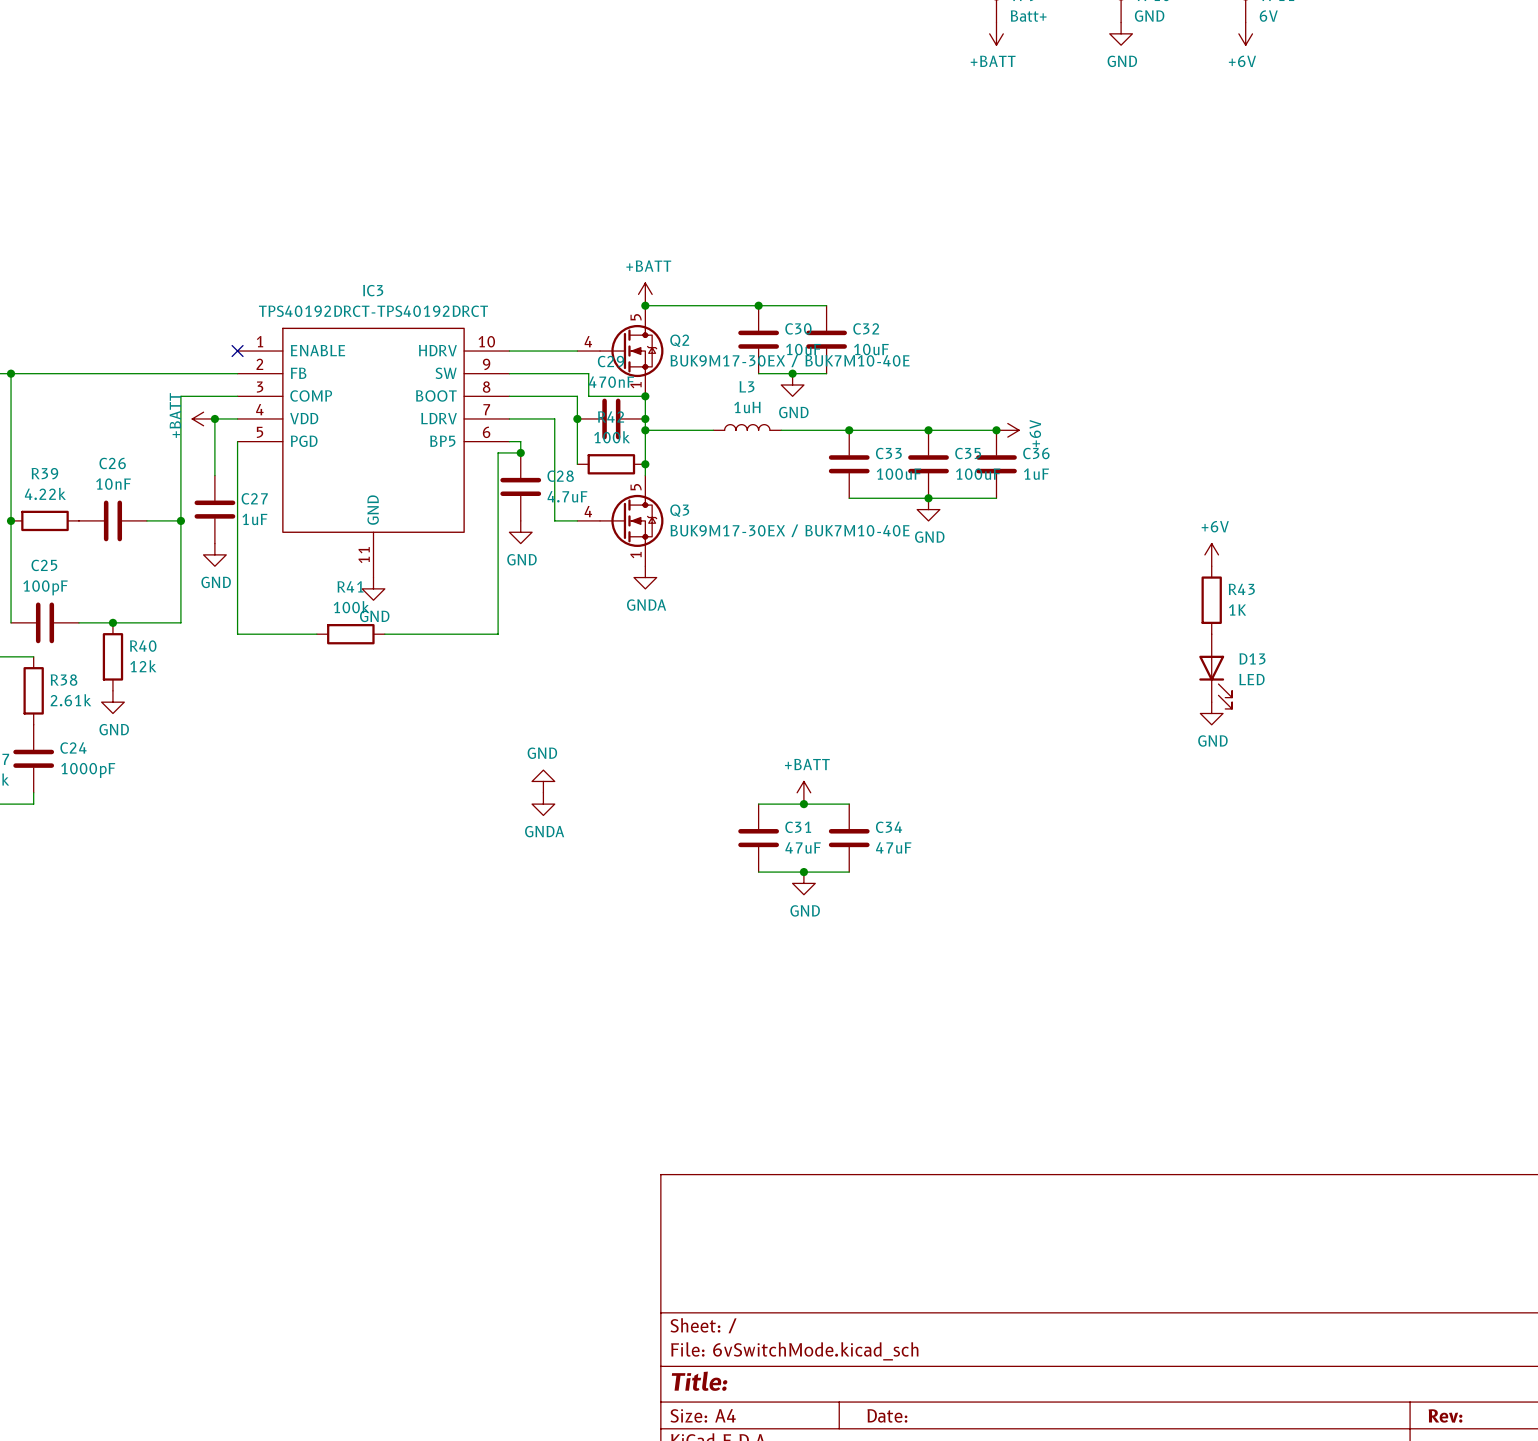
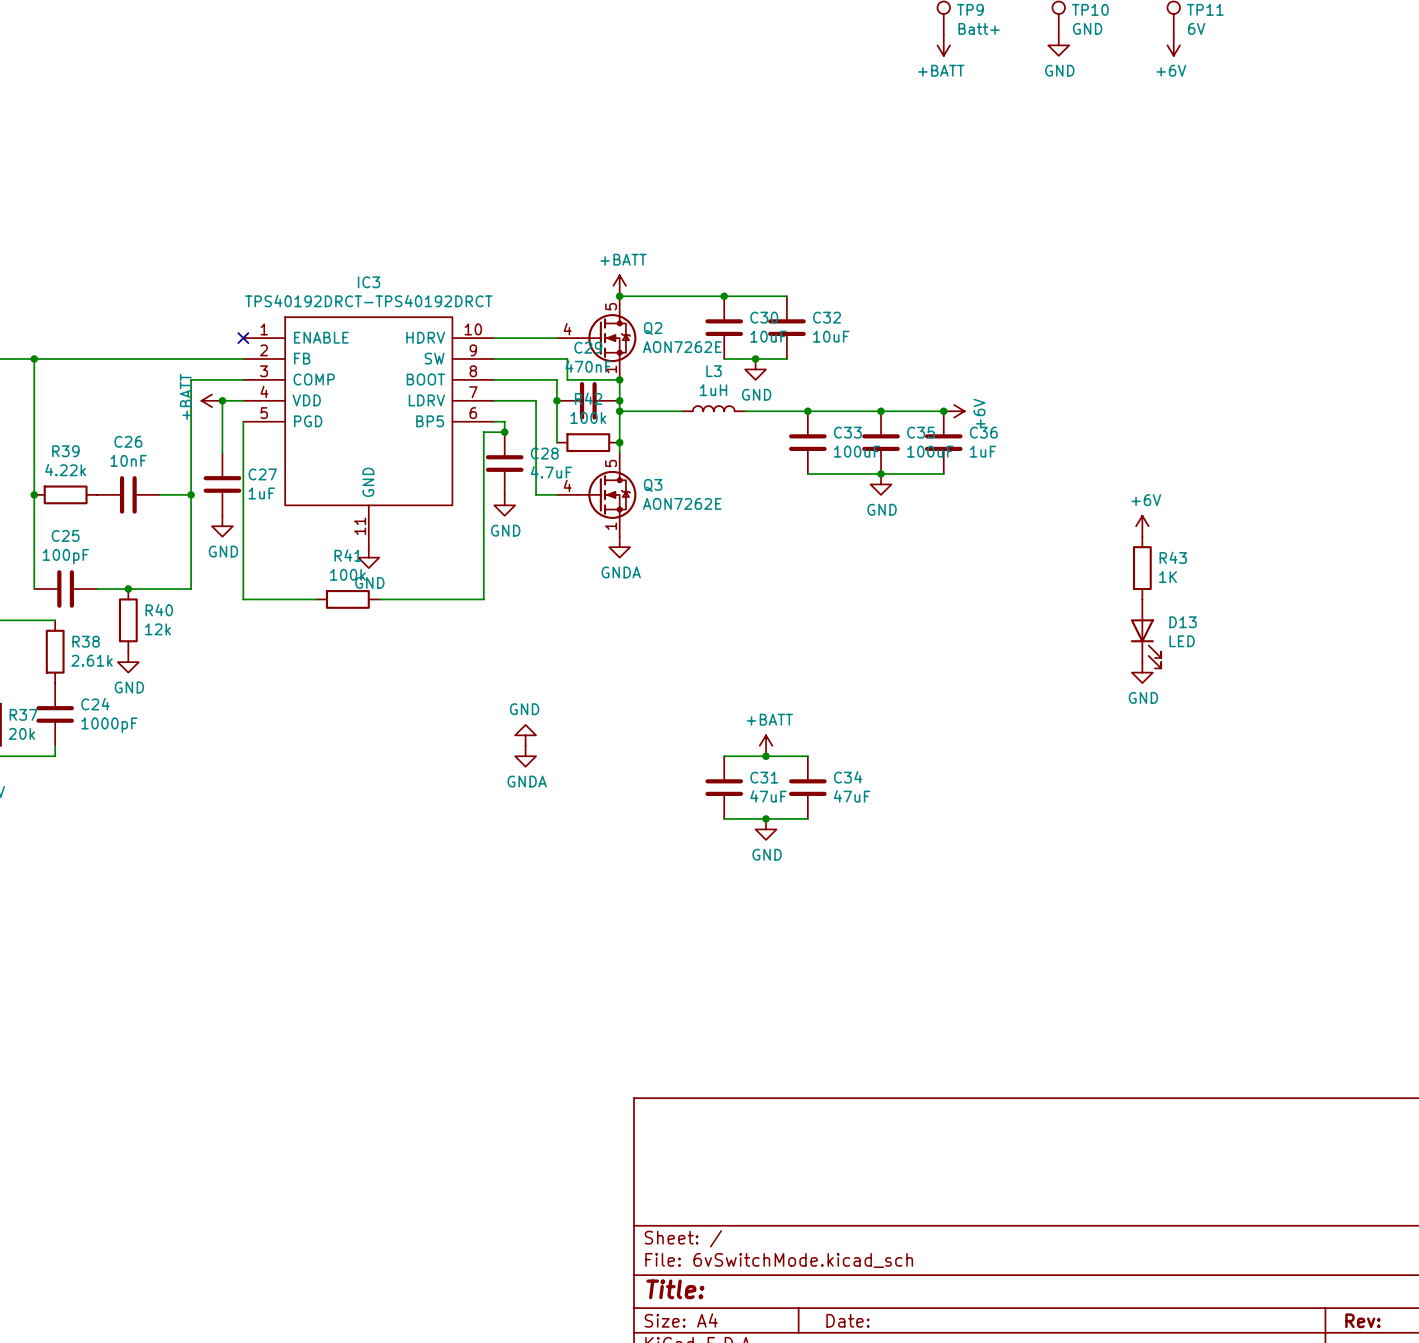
Q2 value: BUK9M17-30EX / BUK7M10-40E (790, 360) -> AON7262E (682, 347)
Q3 value: BUK9M17-30EX / BUK7M10-40E (790, 530) -> AON7262E (682, 503)

